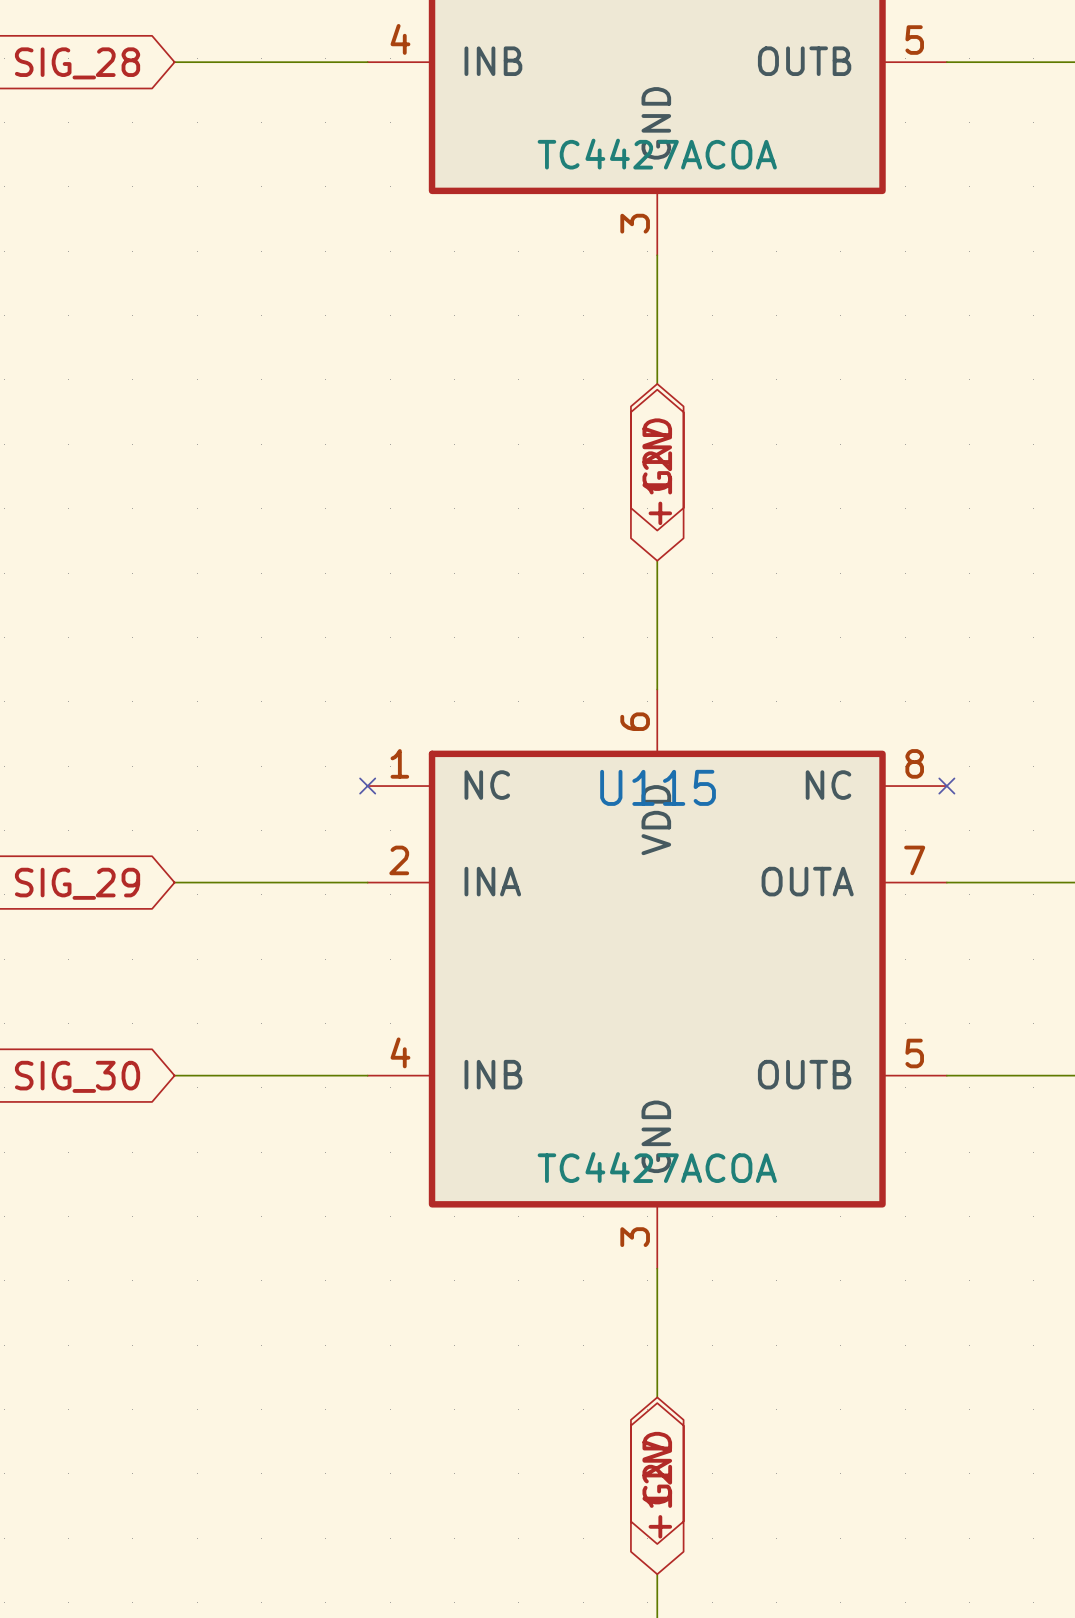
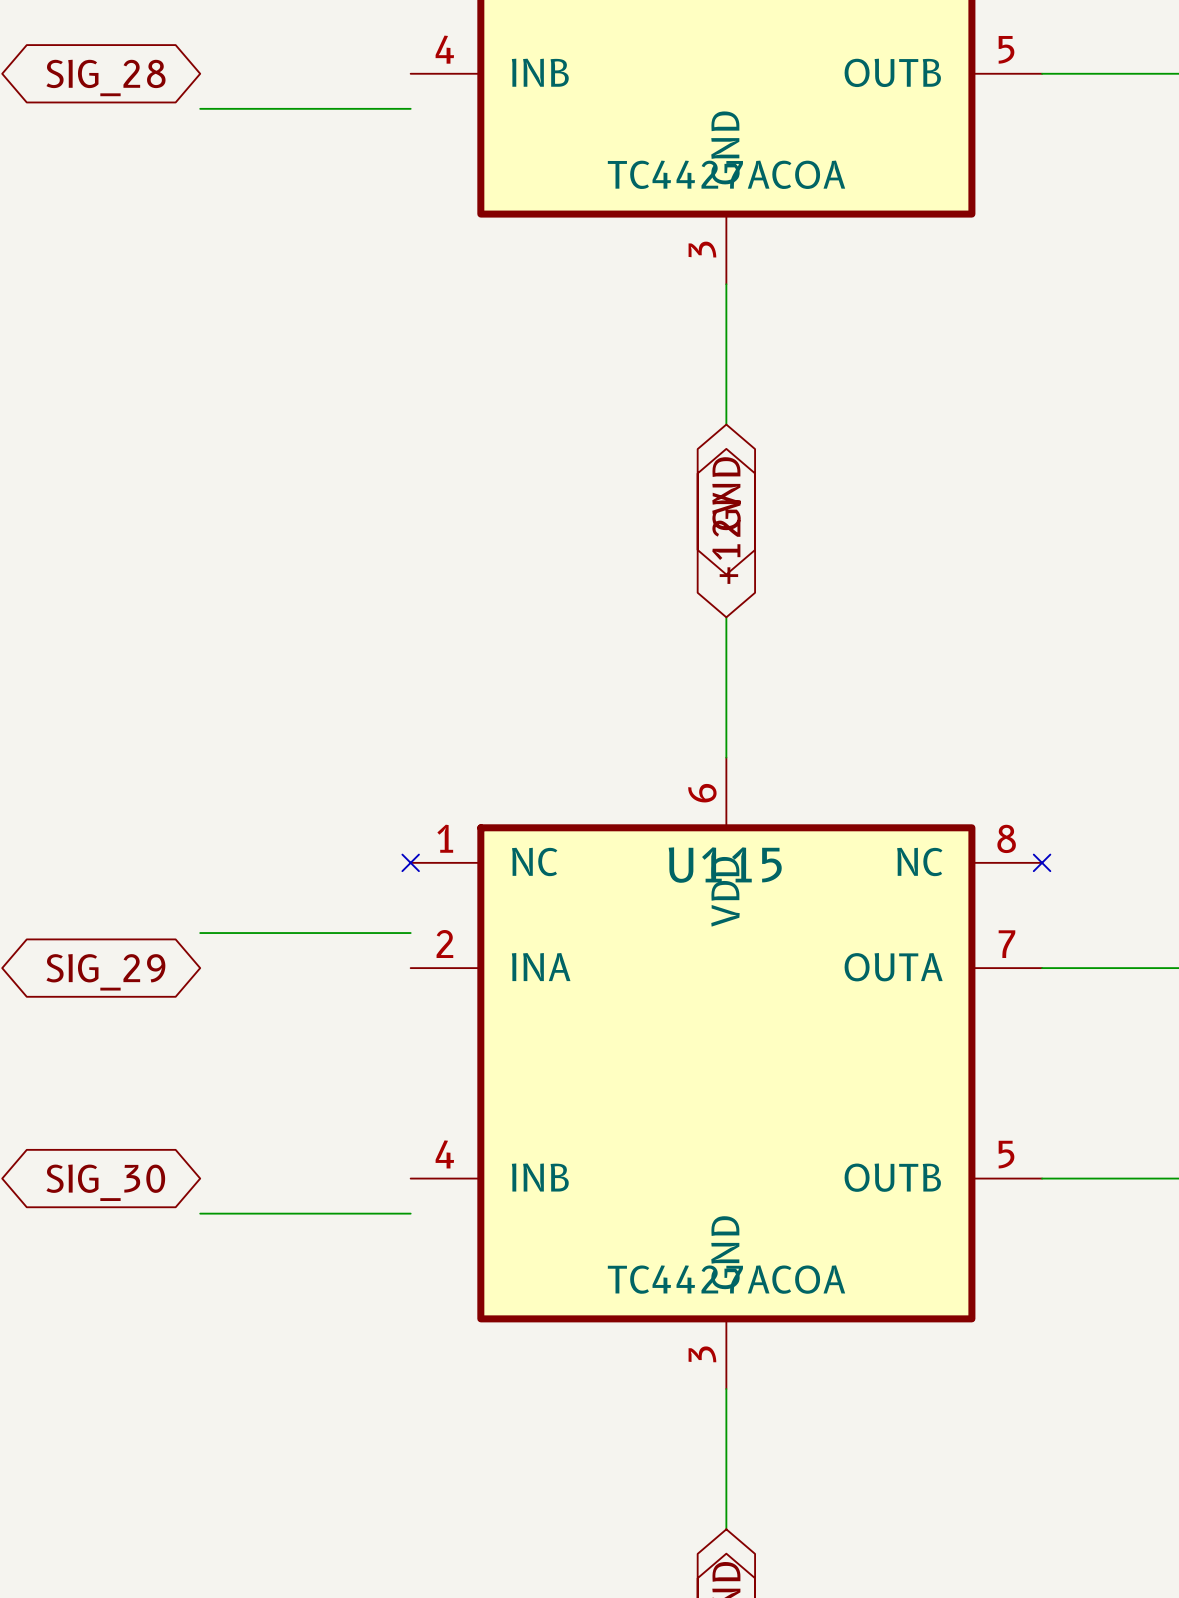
wire: (174, 62) (367, 62) -> (200, 108) (410, 108)
wire: (174, 882) (367, 882) -> (200, 933) (410, 933)
wire: (174, 1075) (367, 1075) -> (200, 1213) (410, 1213)

